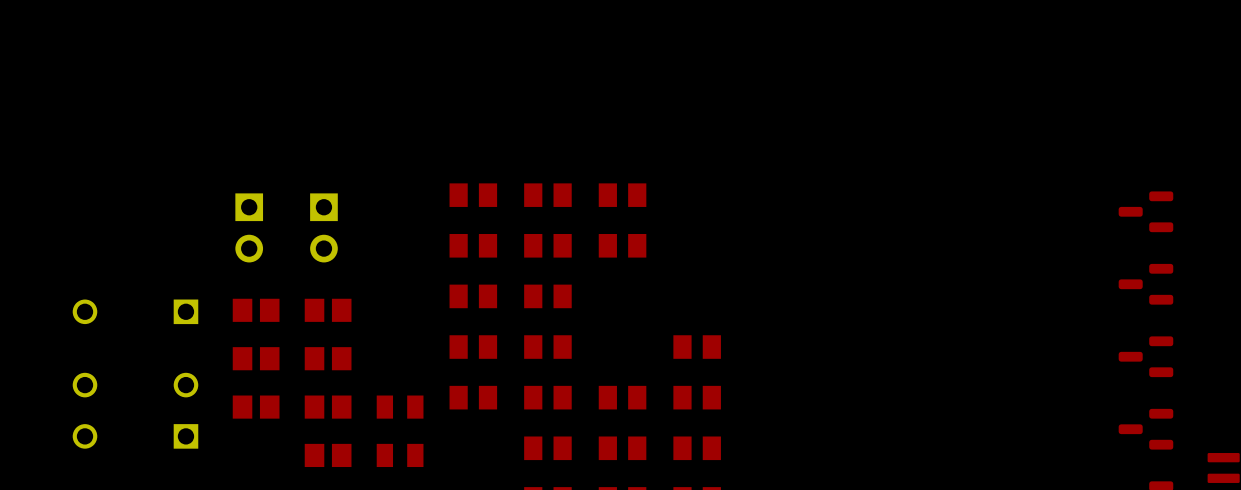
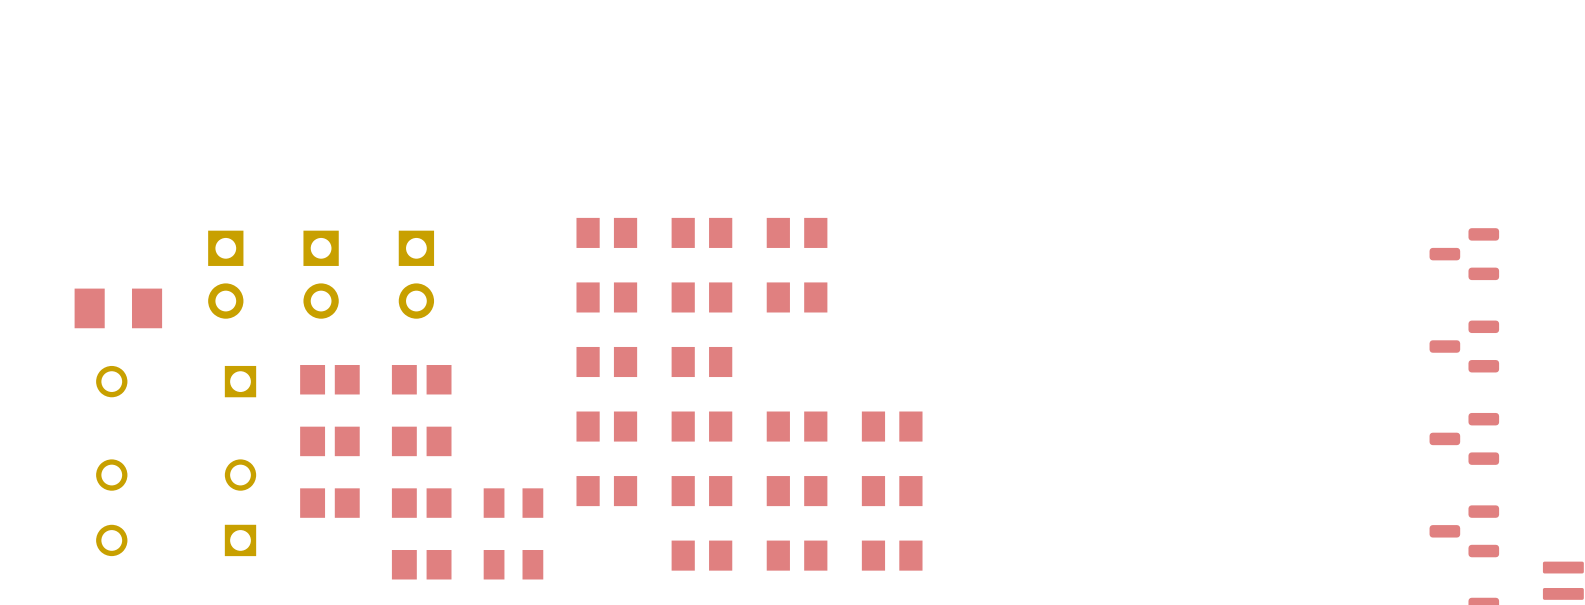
part: none -> (225, 274)
part: none -> (118, 308)
part: none -> (797, 426)

